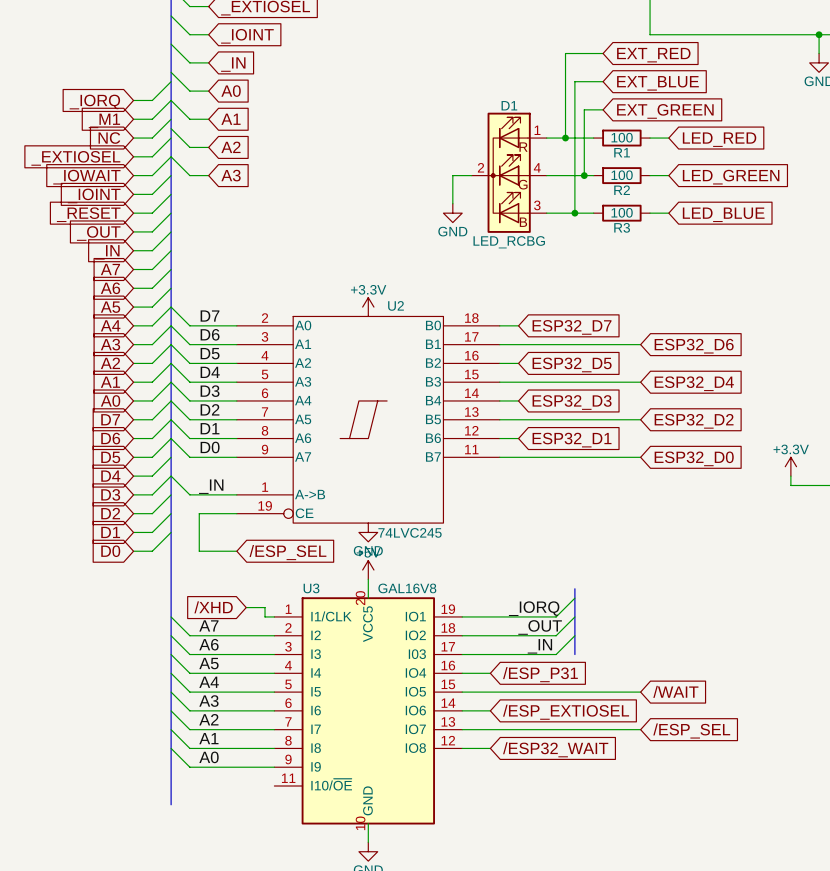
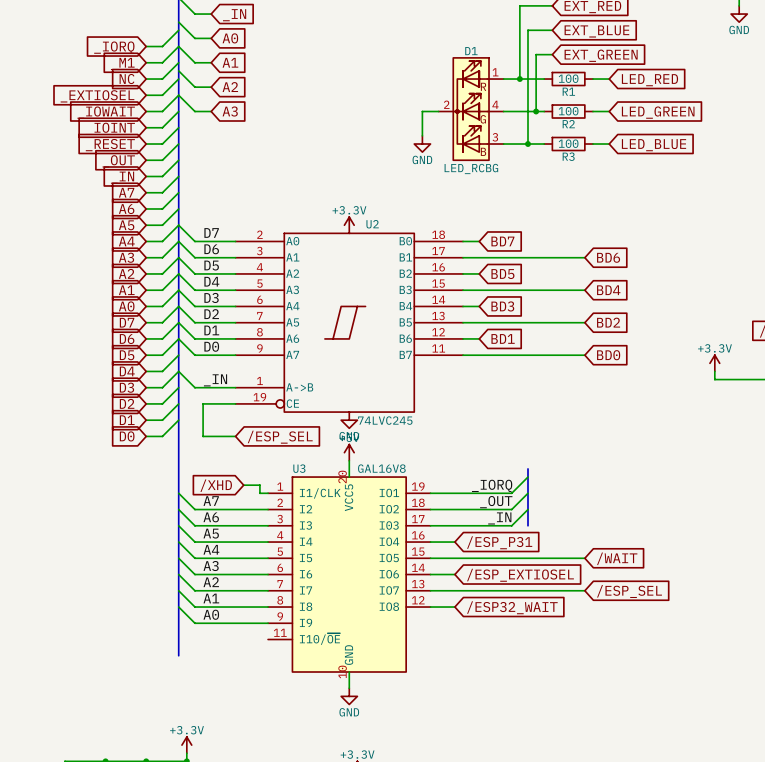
global label: ESP32_D7 (572, 327) -> BD7 (502, 241)
global label: ESP32_D6 (694, 346) -> BD6 (608, 257)
global label: ESP32_D5 (572, 364) -> BD5 (502, 274)
global label: ESP32_D4 (694, 383) -> BD4 (608, 290)
global label: ESP32_D3 (572, 402) -> BD3 (502, 306)
global label: ESP32_D2 (694, 421) -> BD2 (608, 322)
global label: ESP32_D1 (572, 440) -> BD1 (503, 338)
global label: ESP32_D0 (694, 458) -> BD0 (608, 355)

